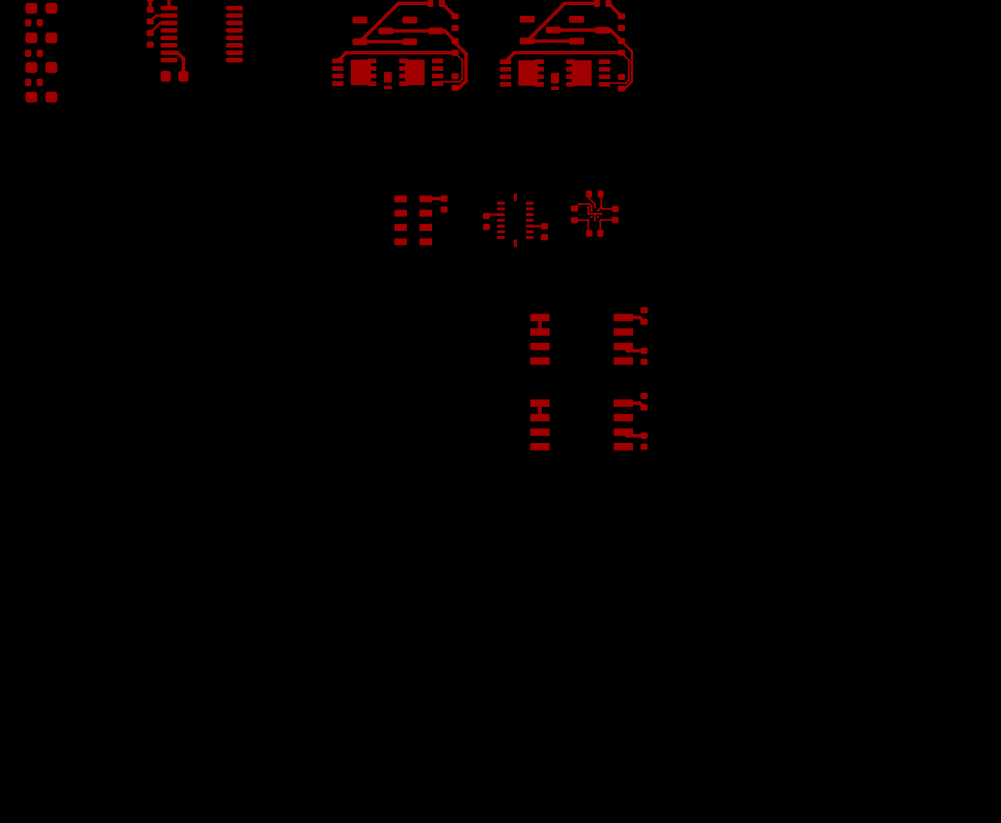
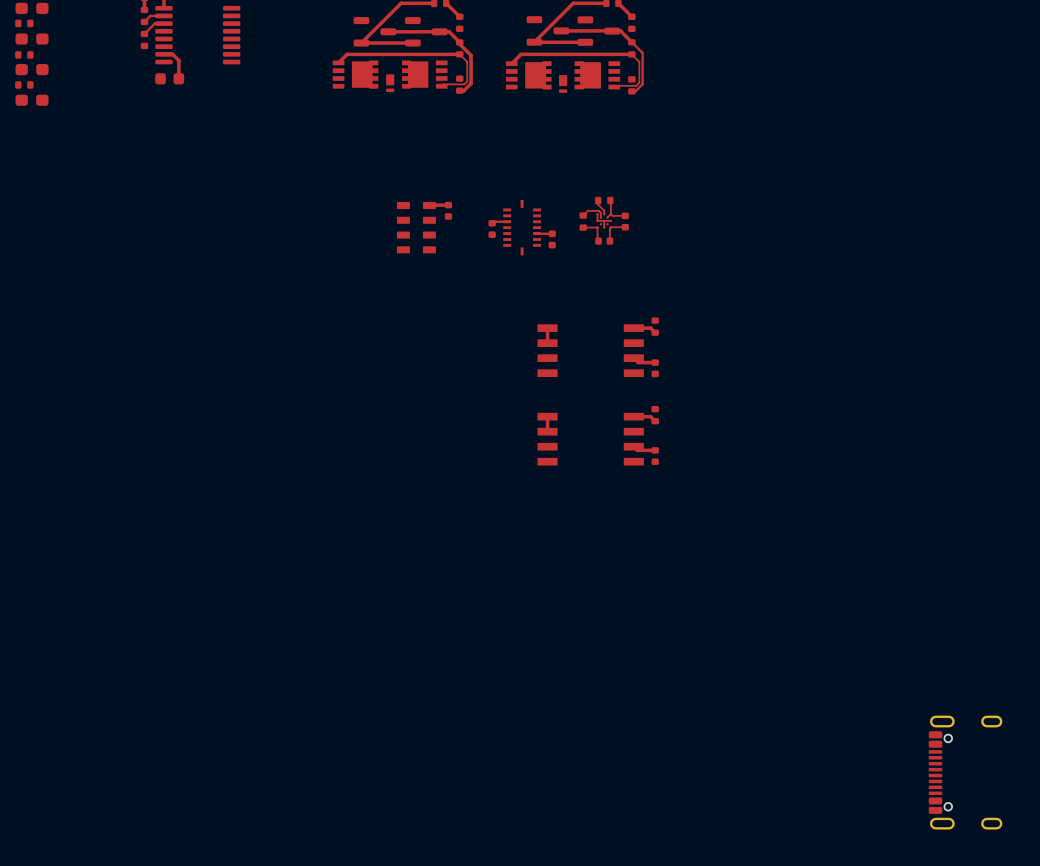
part: none -> (965, 772)

